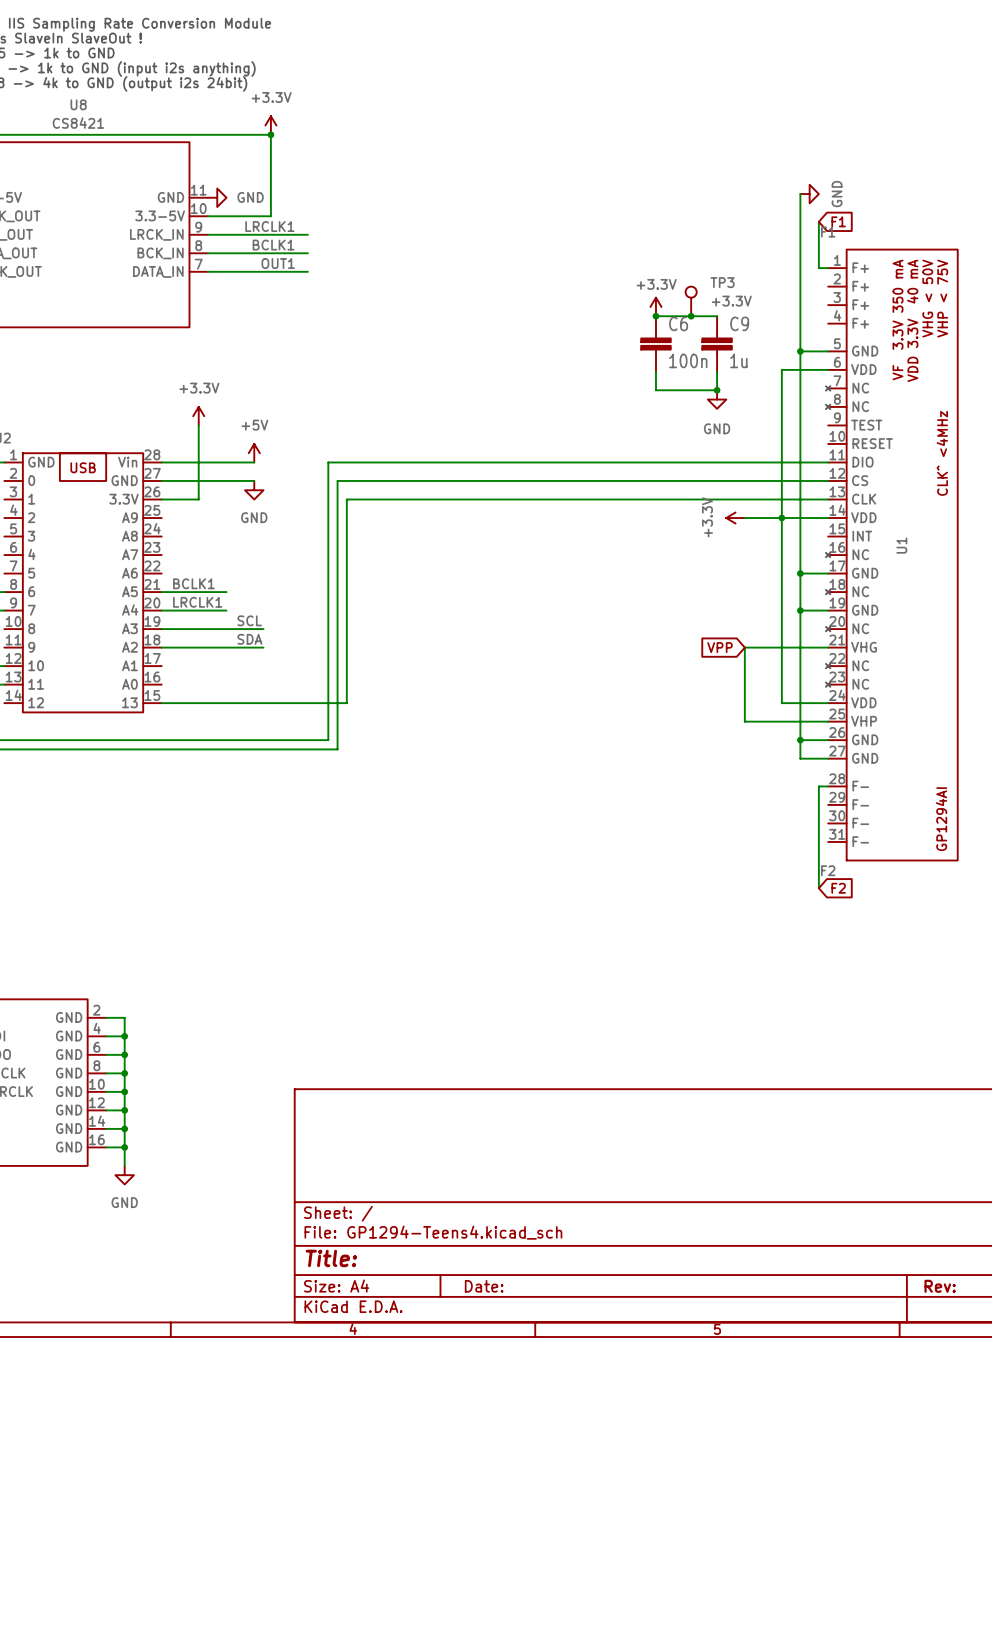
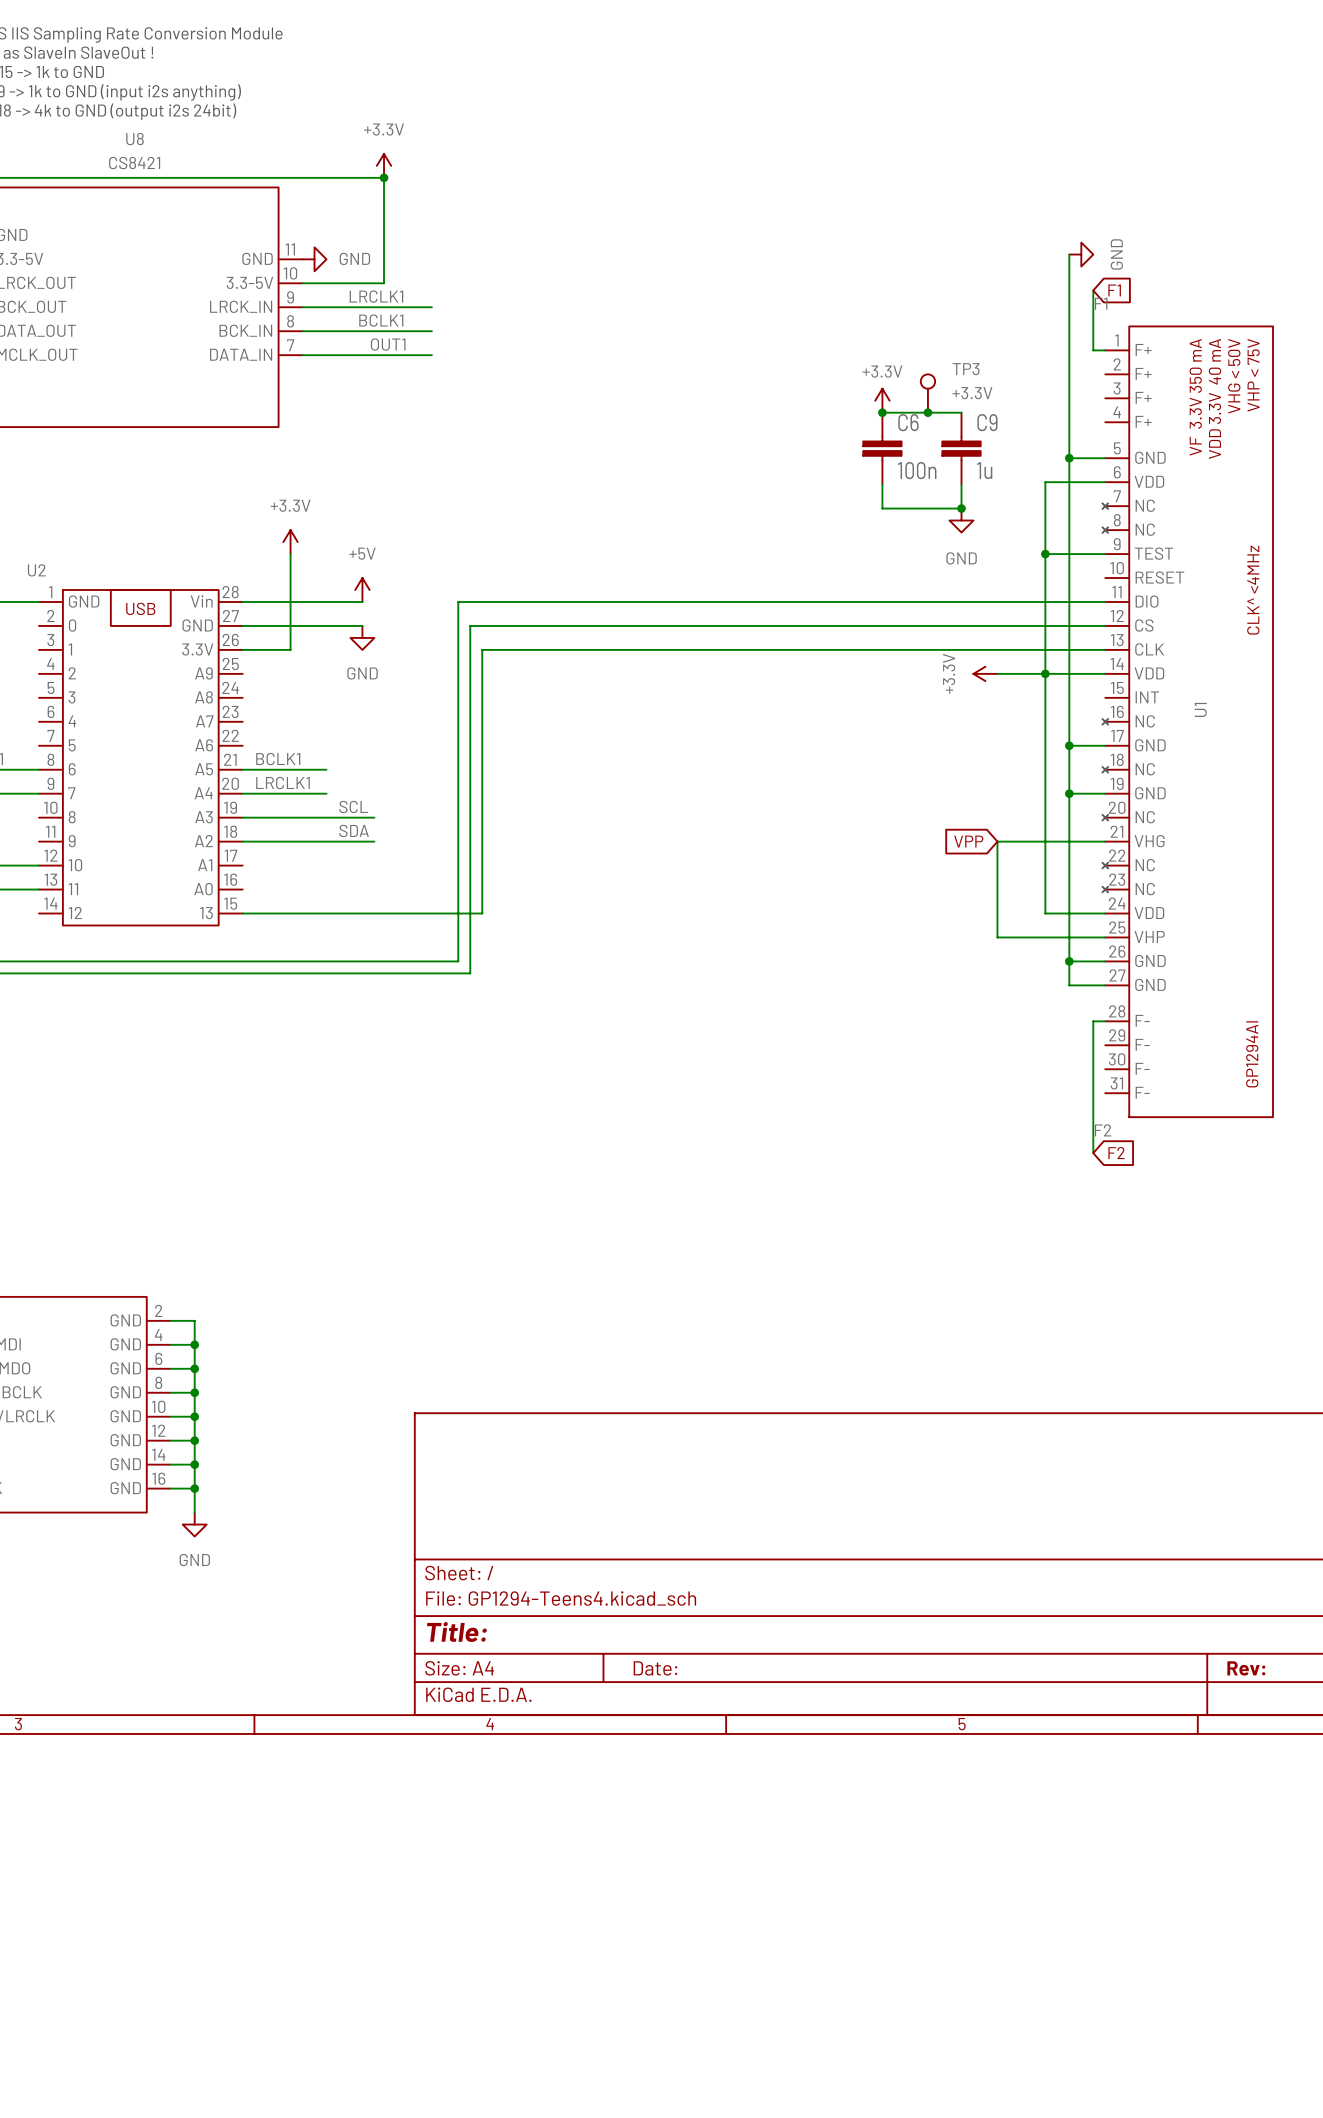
wire: none -> (1045, 554) (1105, 554)
junction: none -> (1045, 554)

